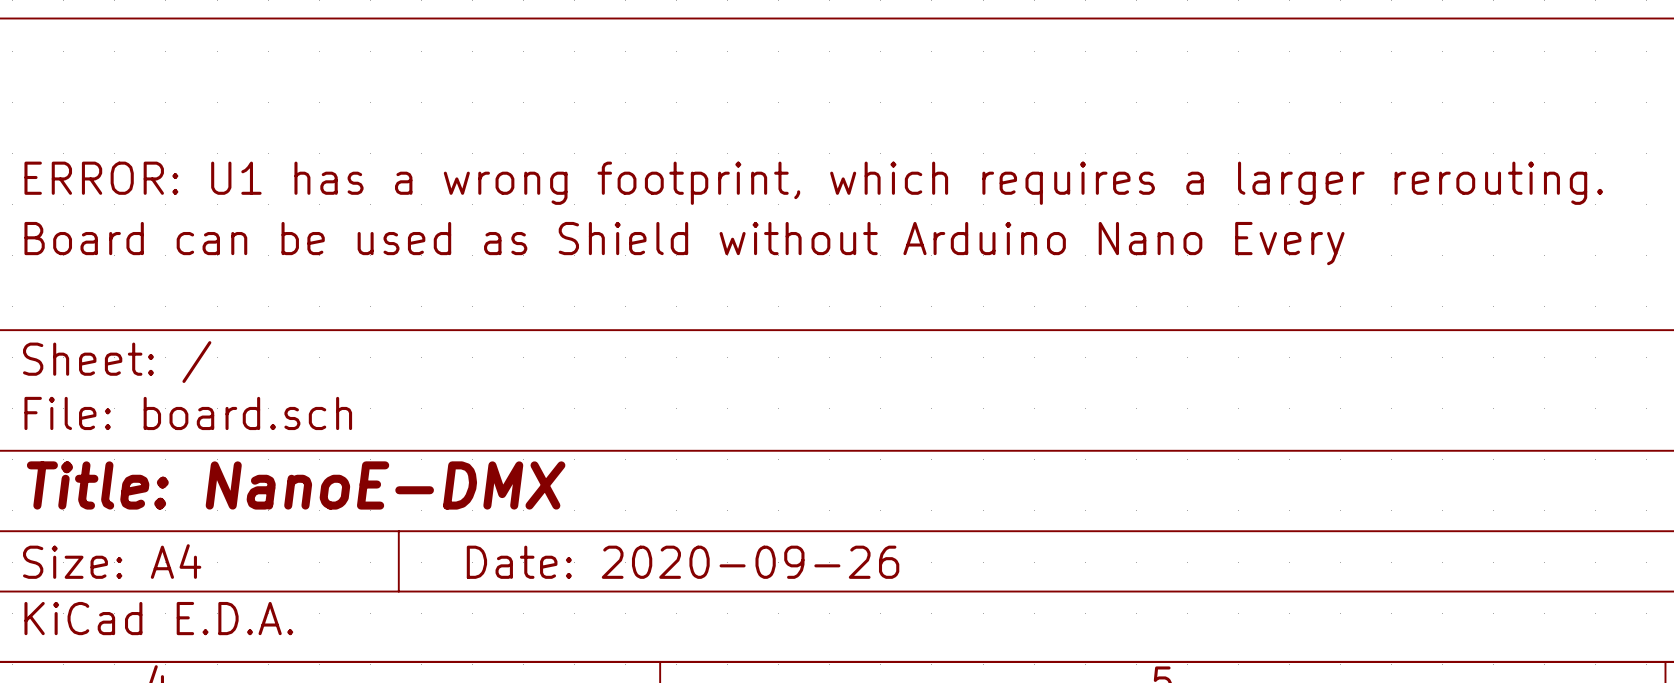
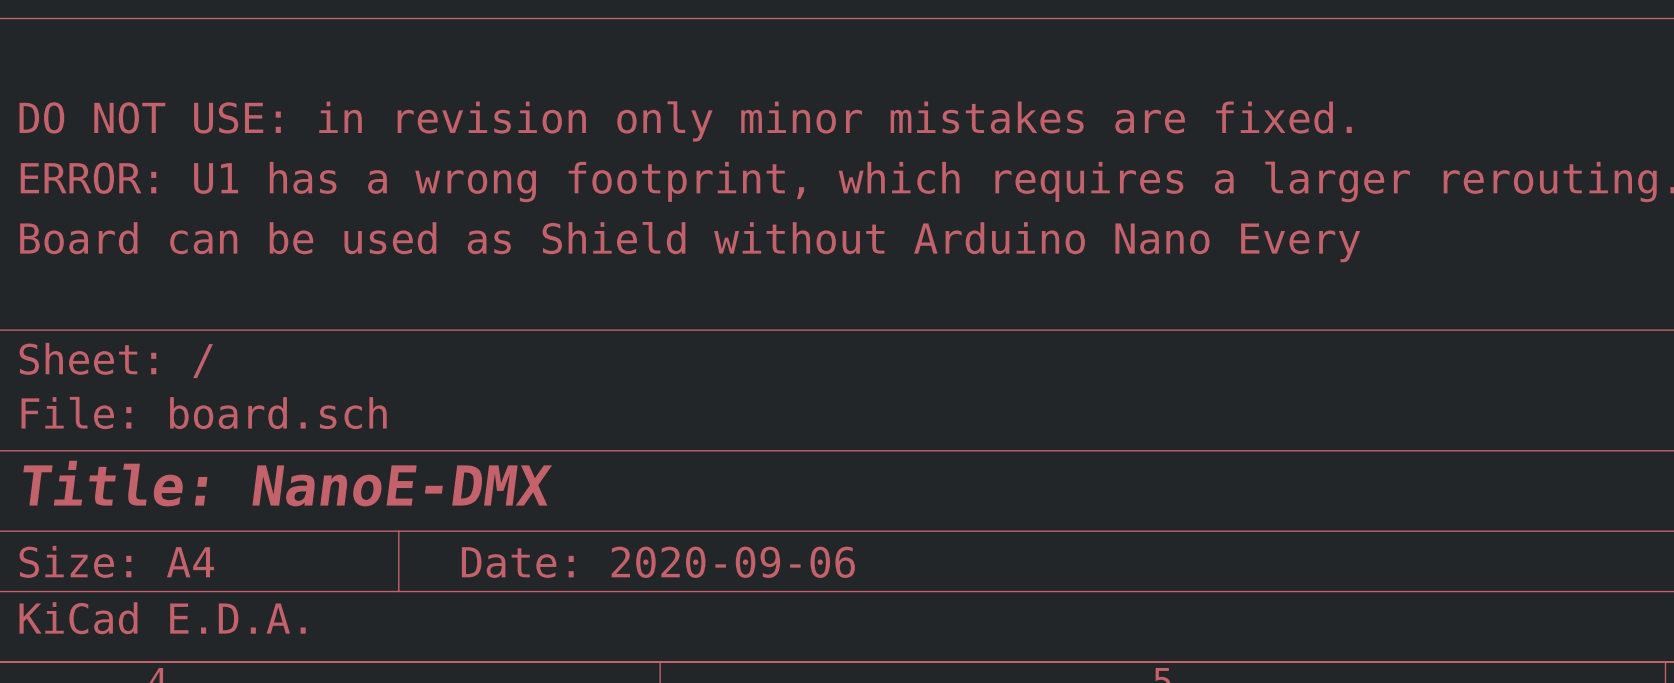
title block: none -> DO NOT USE: in revision only minor mistakes are fixed. (685, 121)
title block: Date: 2020-09-26 (683, 562) -> Date: 2020-09-06 (658, 562)

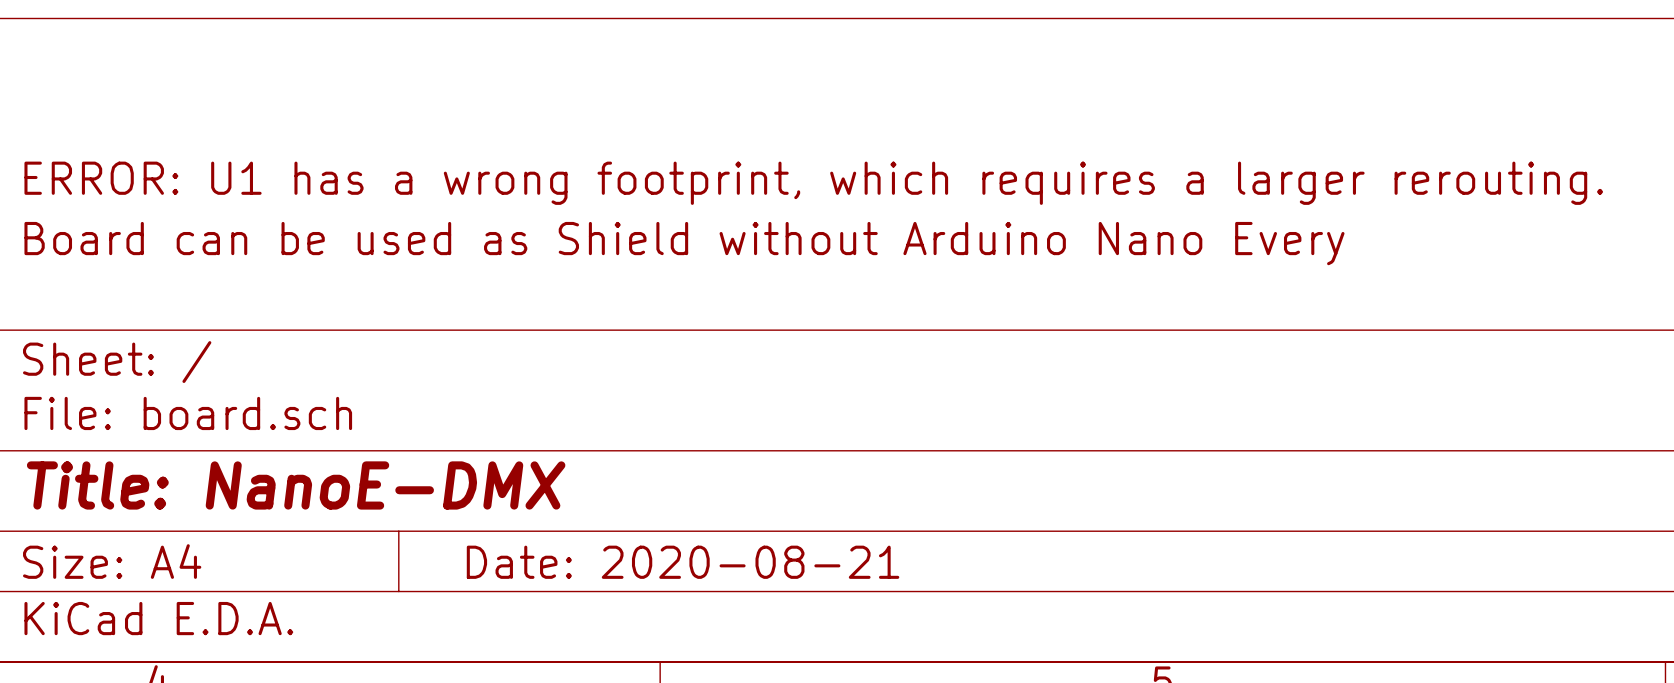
title block: DO NOT USE: in revision only minor mistakes are fixed. (685, 121) -> none
title block: Date: 2020-09-06 (658, 562) -> Date: 2020-08-21 (683, 562)

